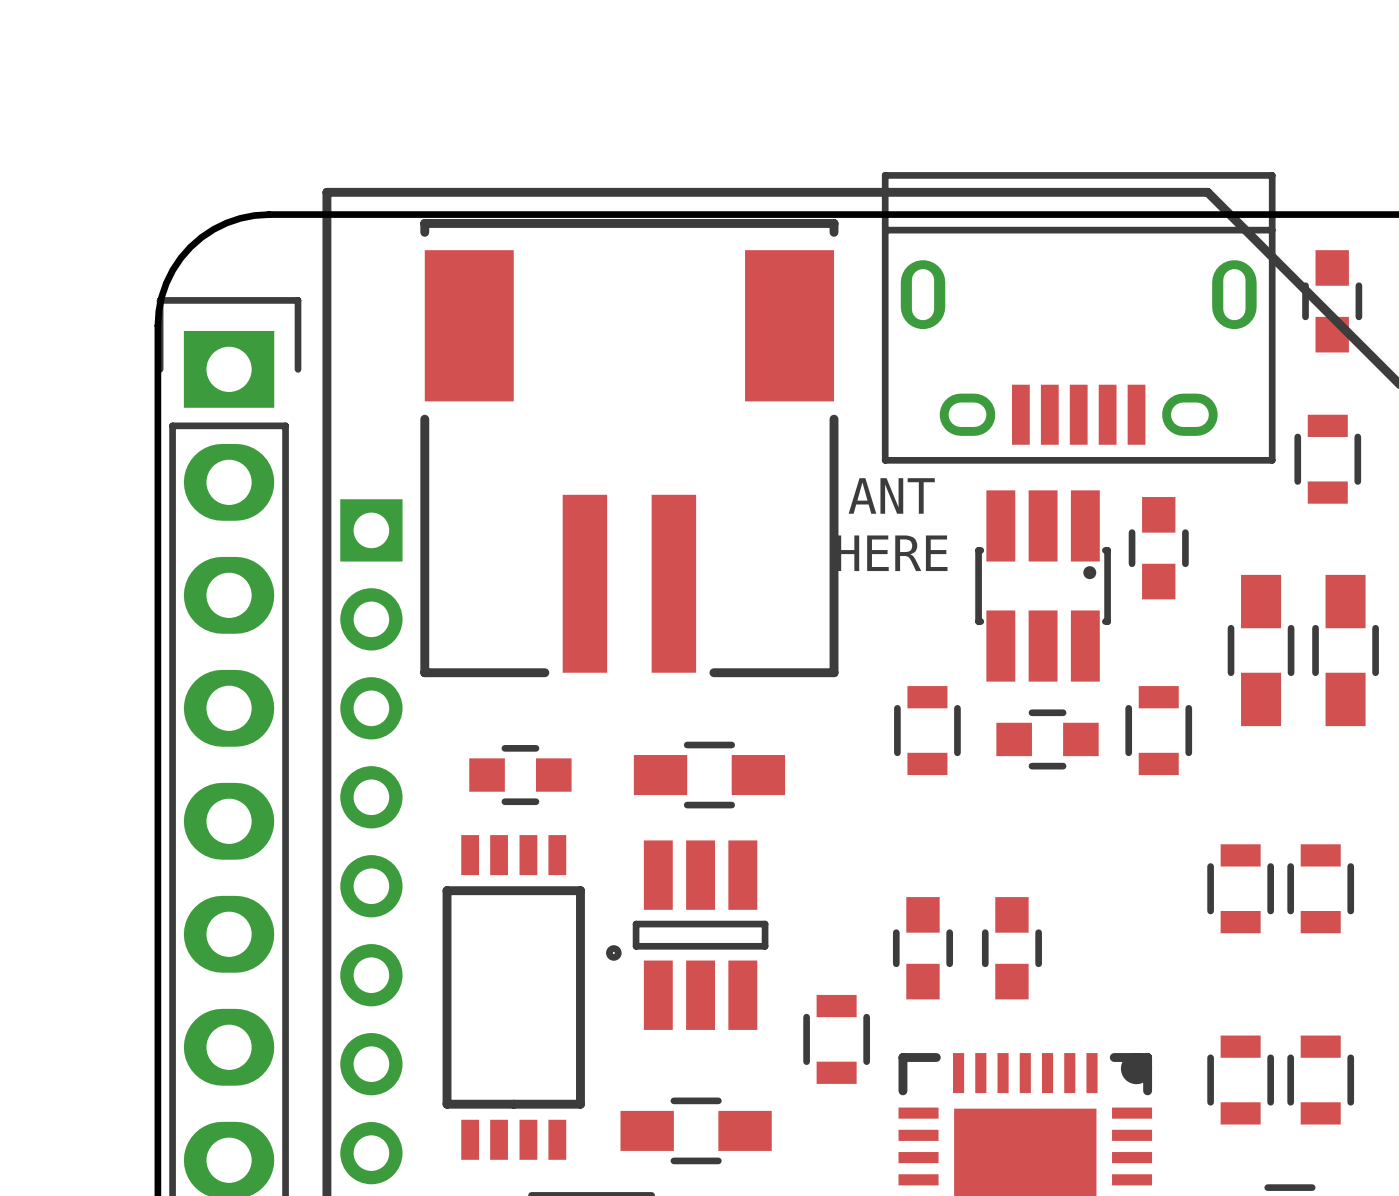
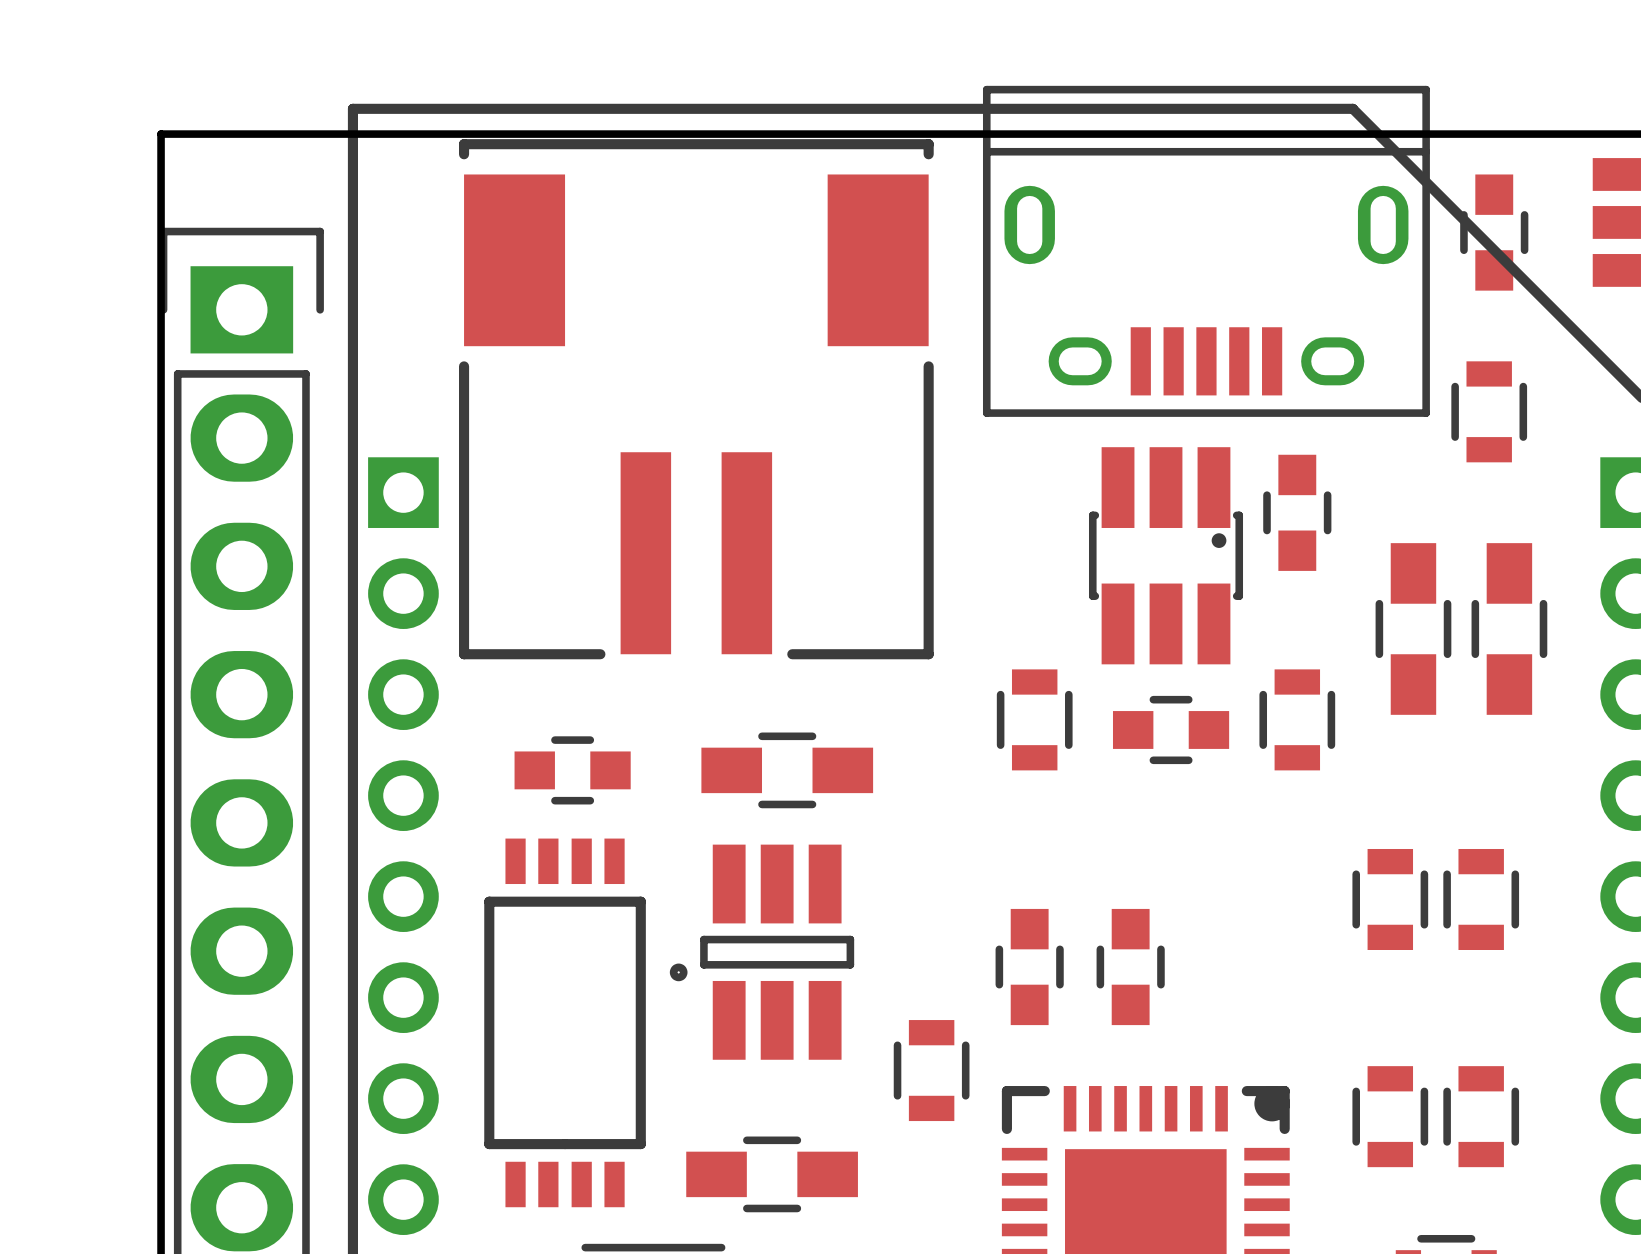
board edge: (269, 214) (240, 218) (226, 223) (213, 229) (190, 247) (172, 270) (166, 283) (161, 296) (157, 325) -> (287, 134) (161, 134) (161, 260)
text: ANT (891, 495) -> none
text: HERE (891, 553) -> none

